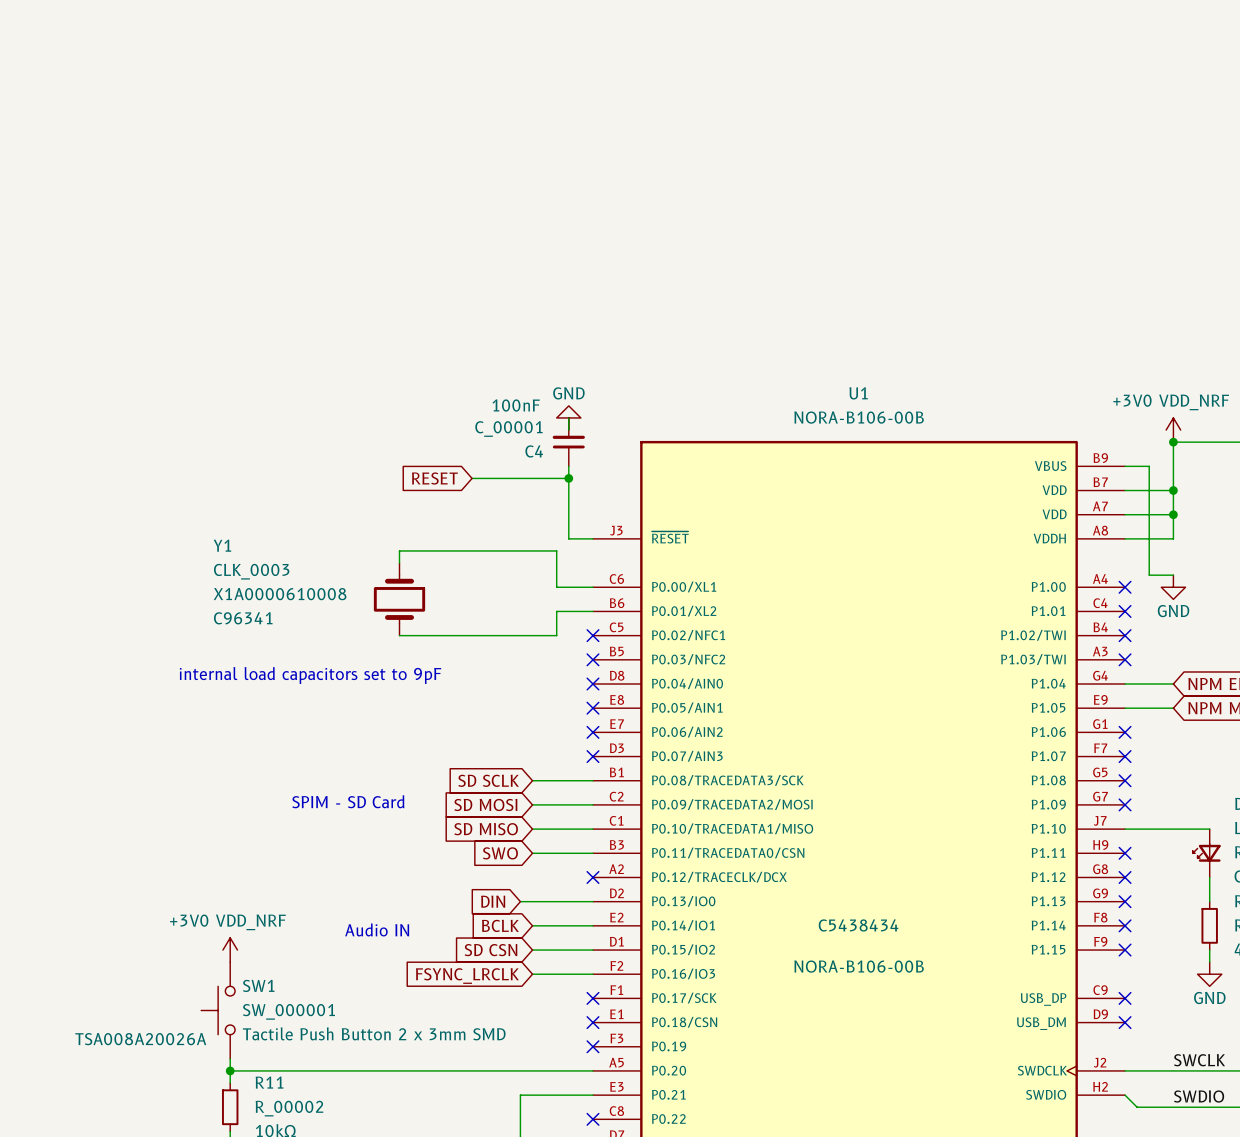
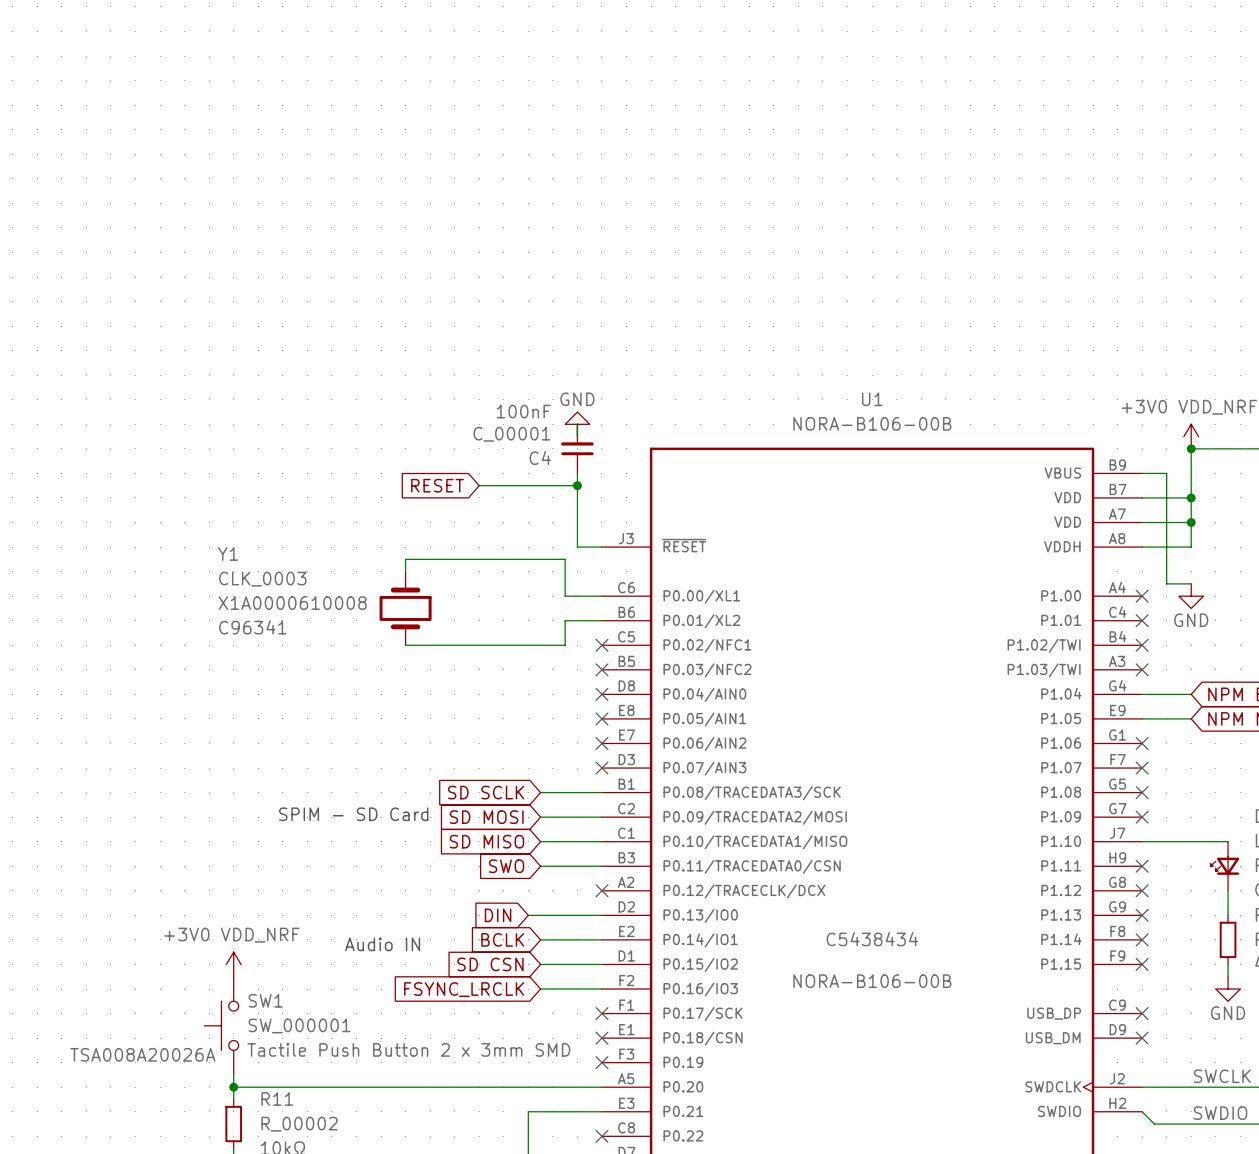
text: internal load capacitors set to 9pF (310, 675) -> none

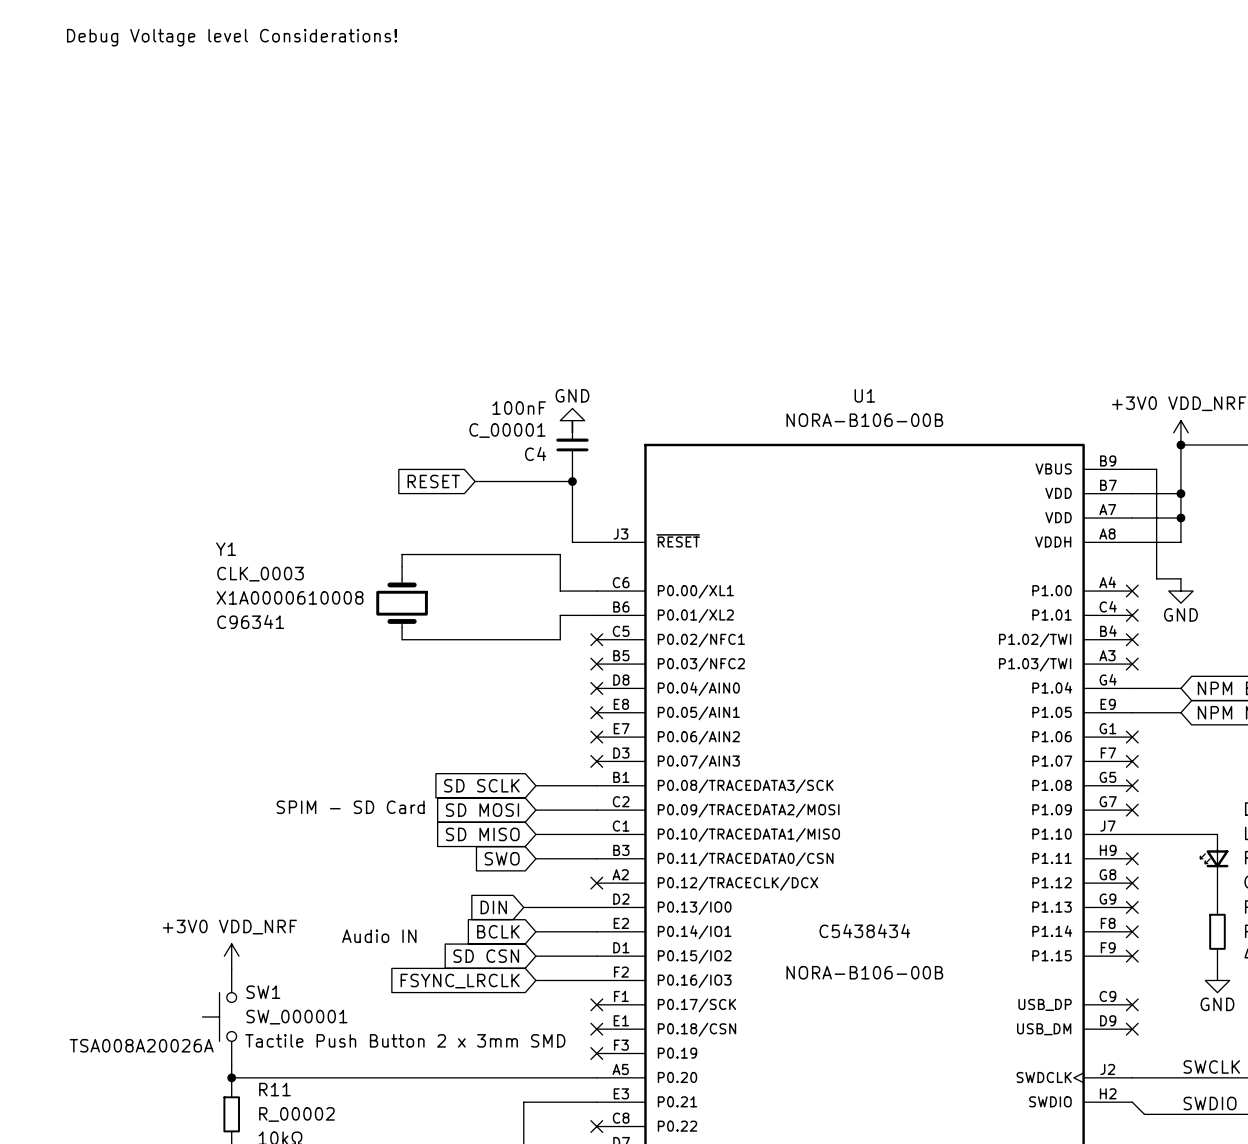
text: none -> Debug Voltage level Considerations! (231, 37)

